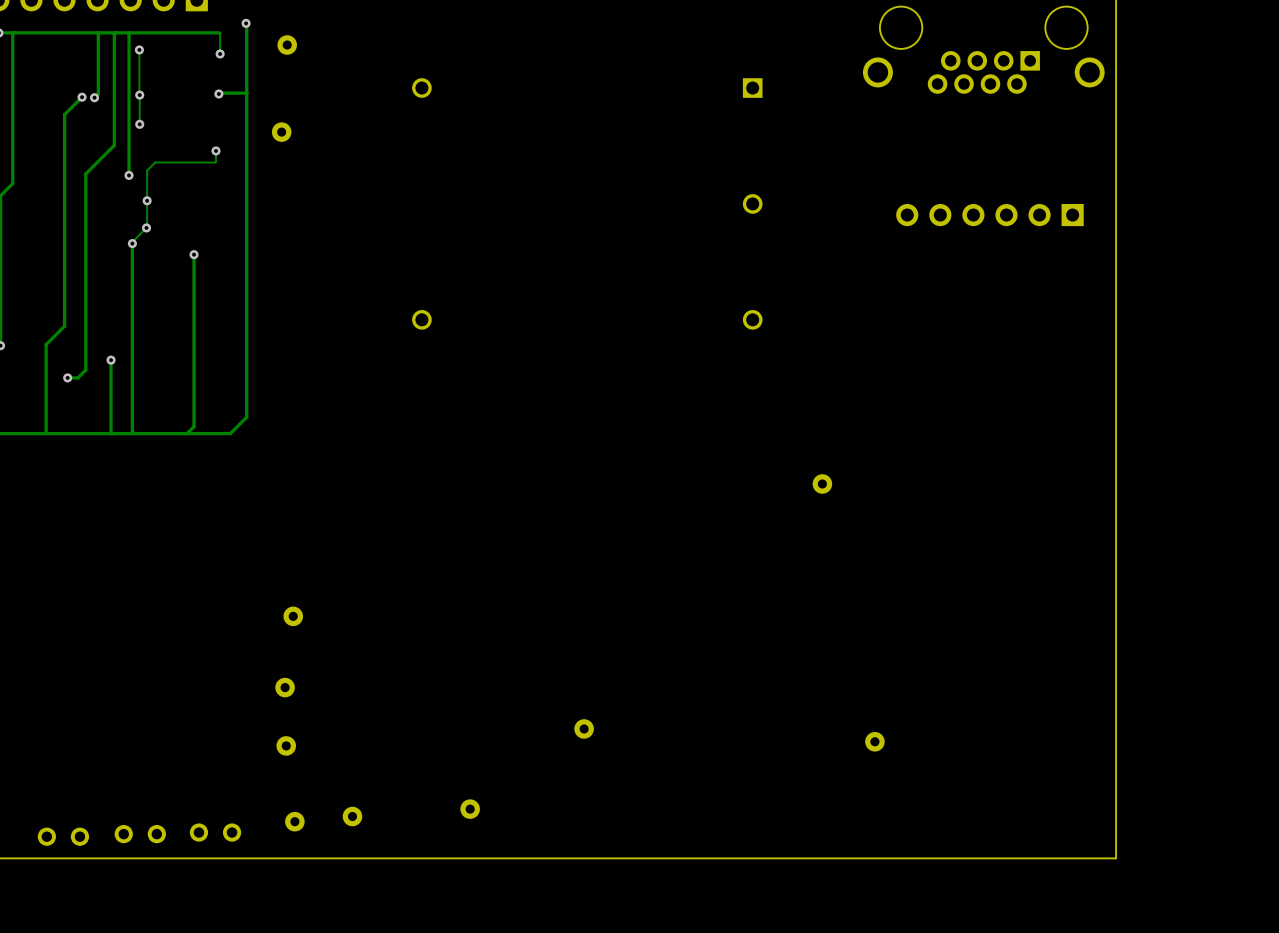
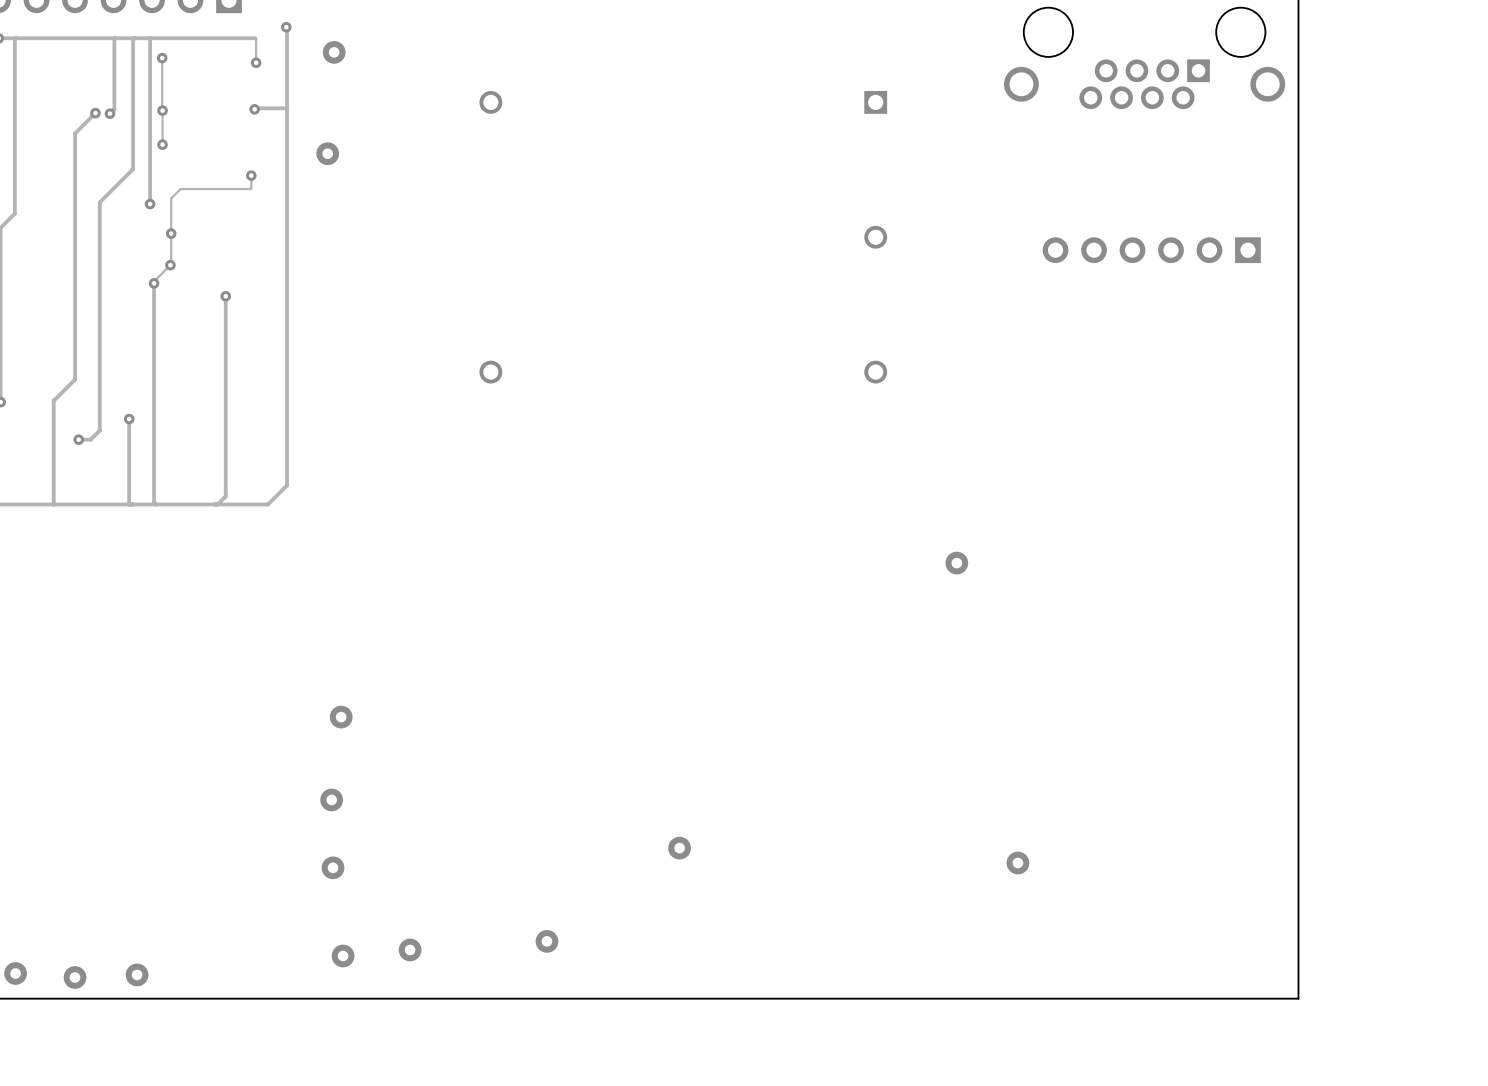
part footprint: [37, 827, 90, 846] -> [63, 966, 87, 989]
part: (215, 832) -> none
part: (140, 834) -> none
part: none -> (15, 973)
part: none -> (137, 974)

